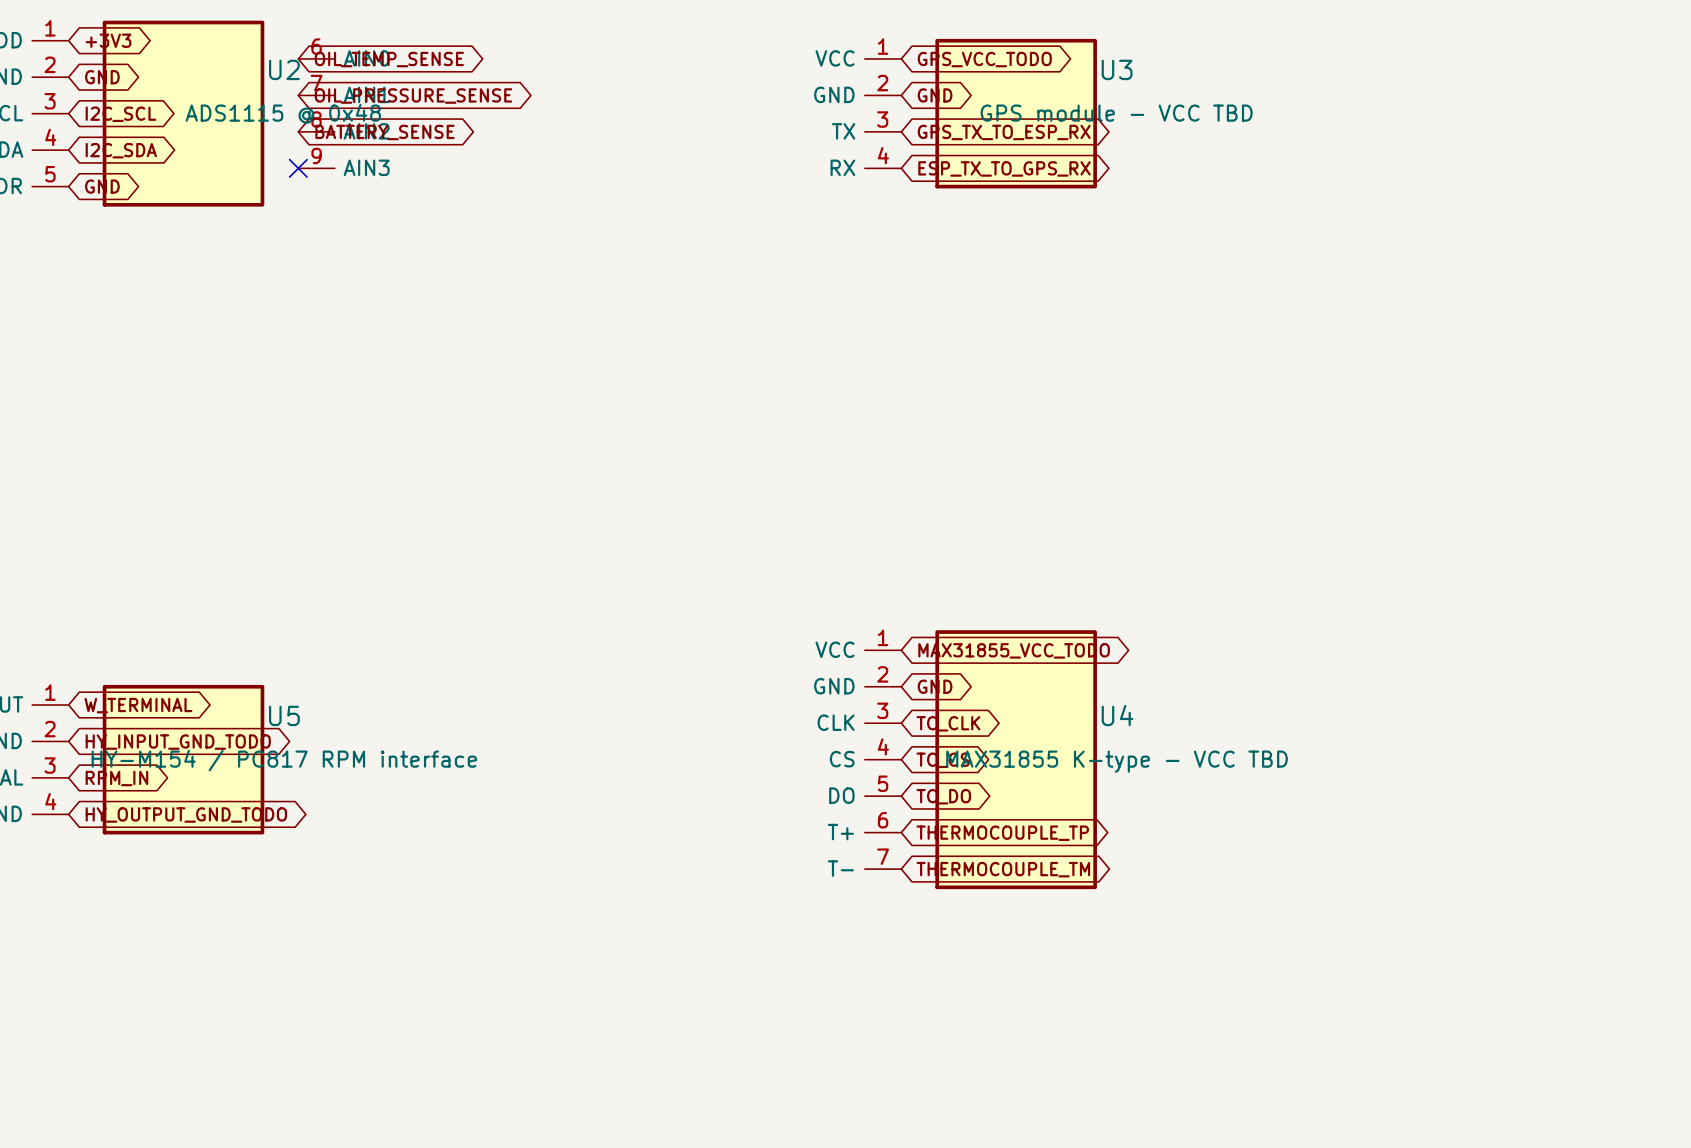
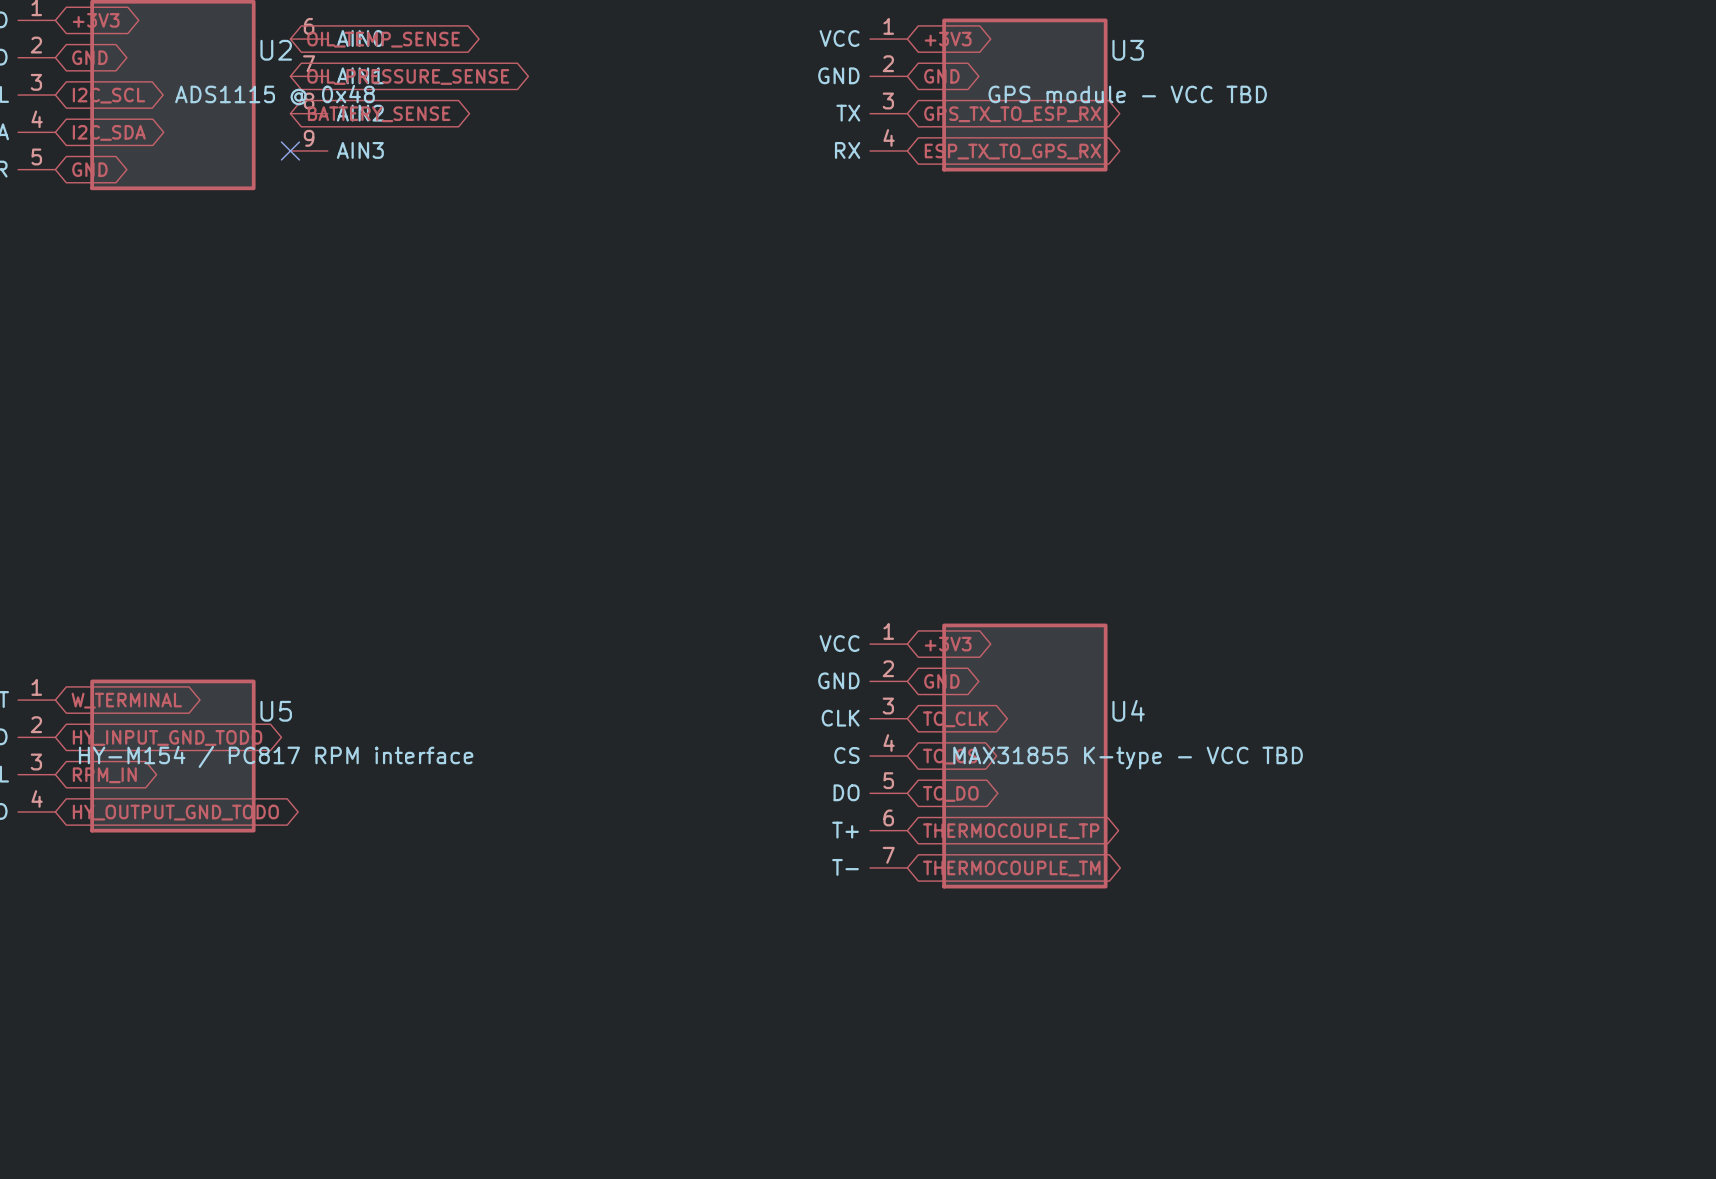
global label: GPS_VCC_TODO (984, 59) -> +3V3 (948, 39)
global label: MAX31855_VCC_TODO (1014, 650) -> +3V3 (948, 644)

